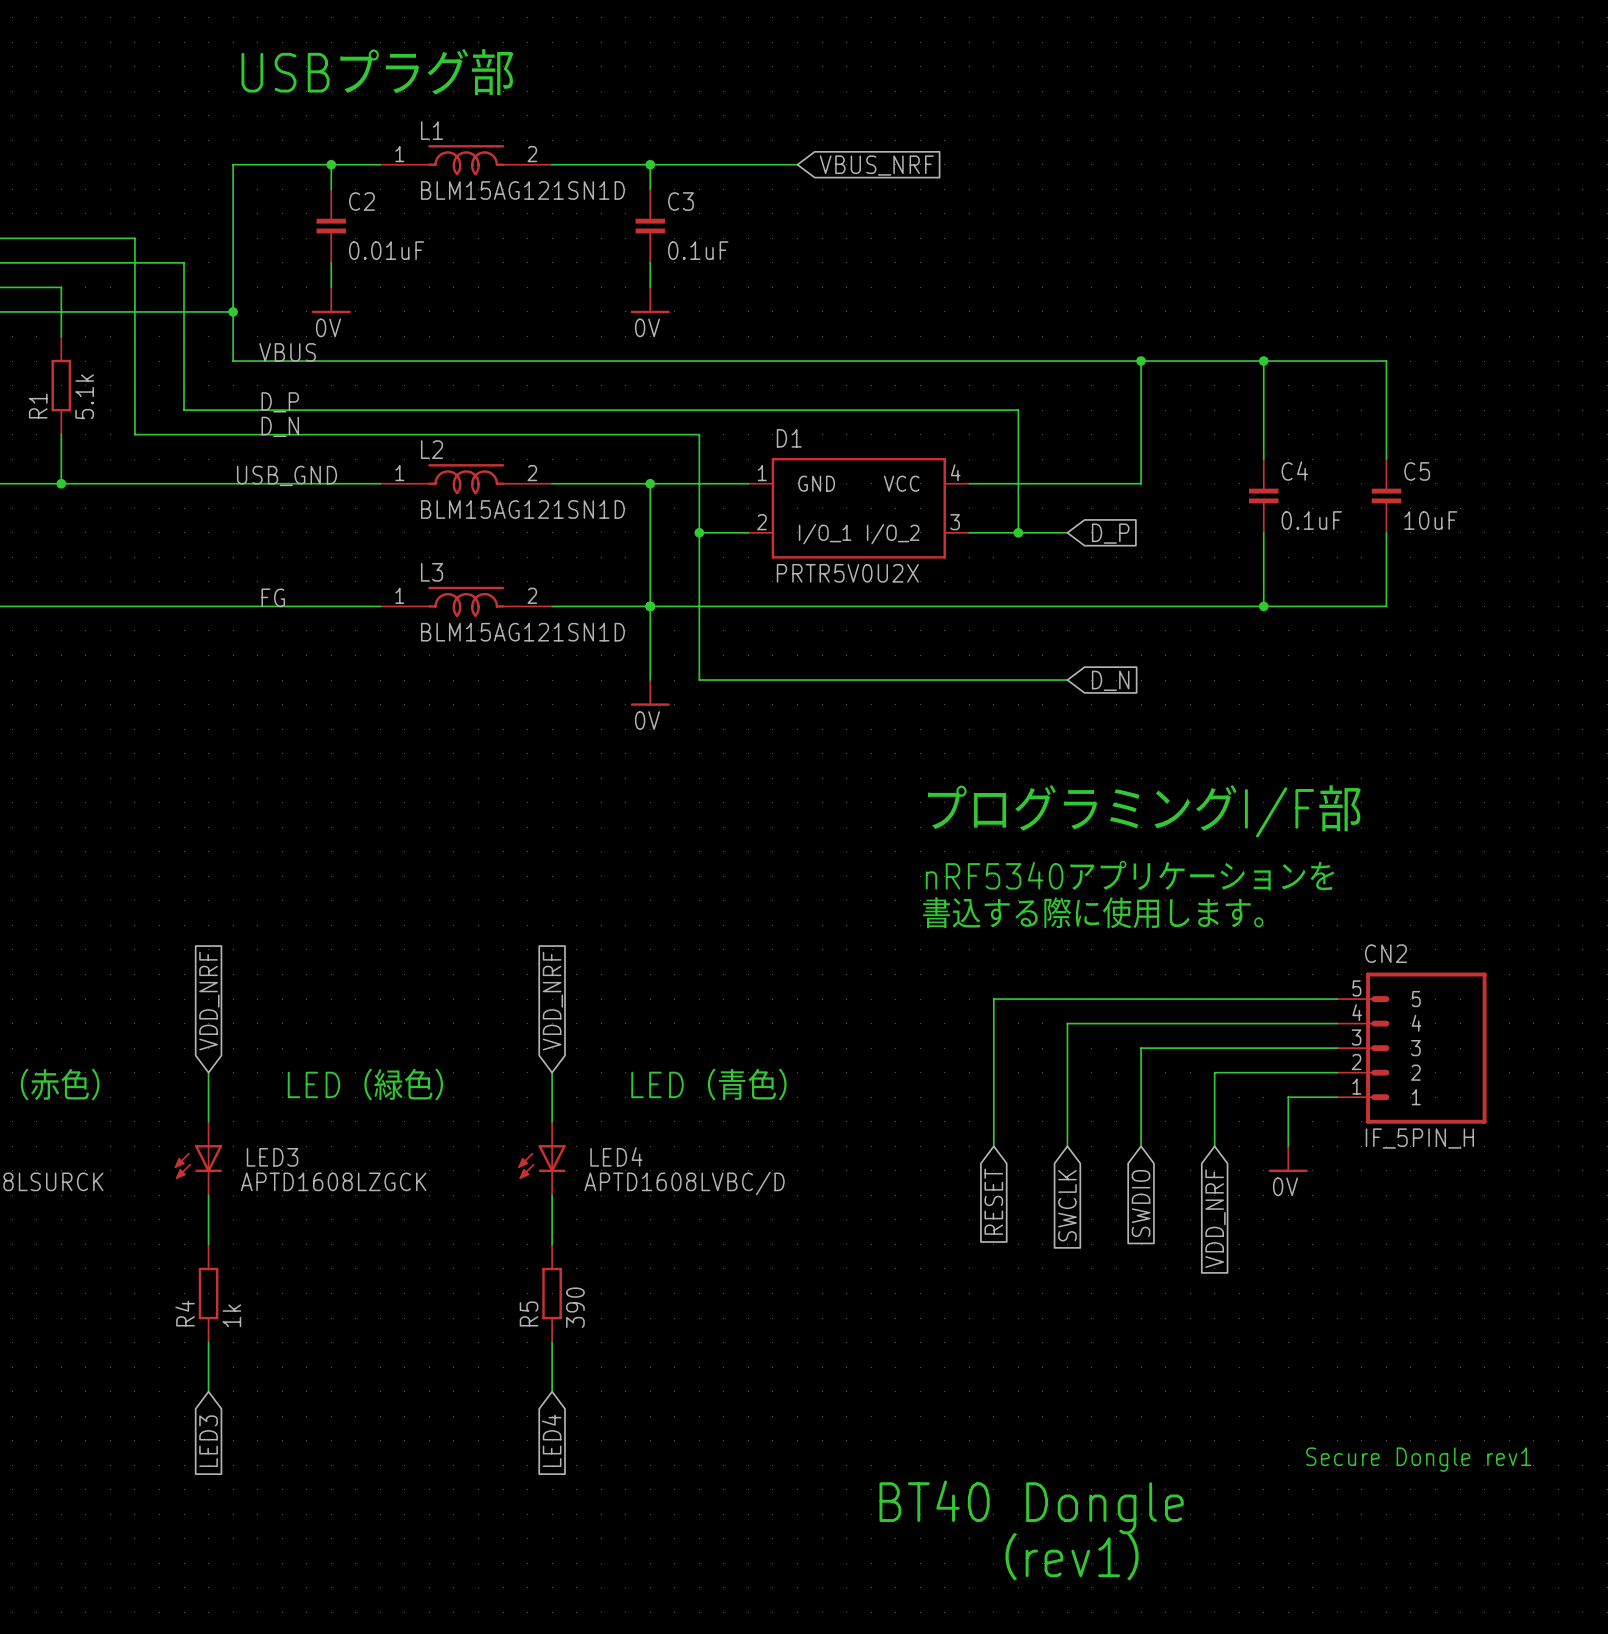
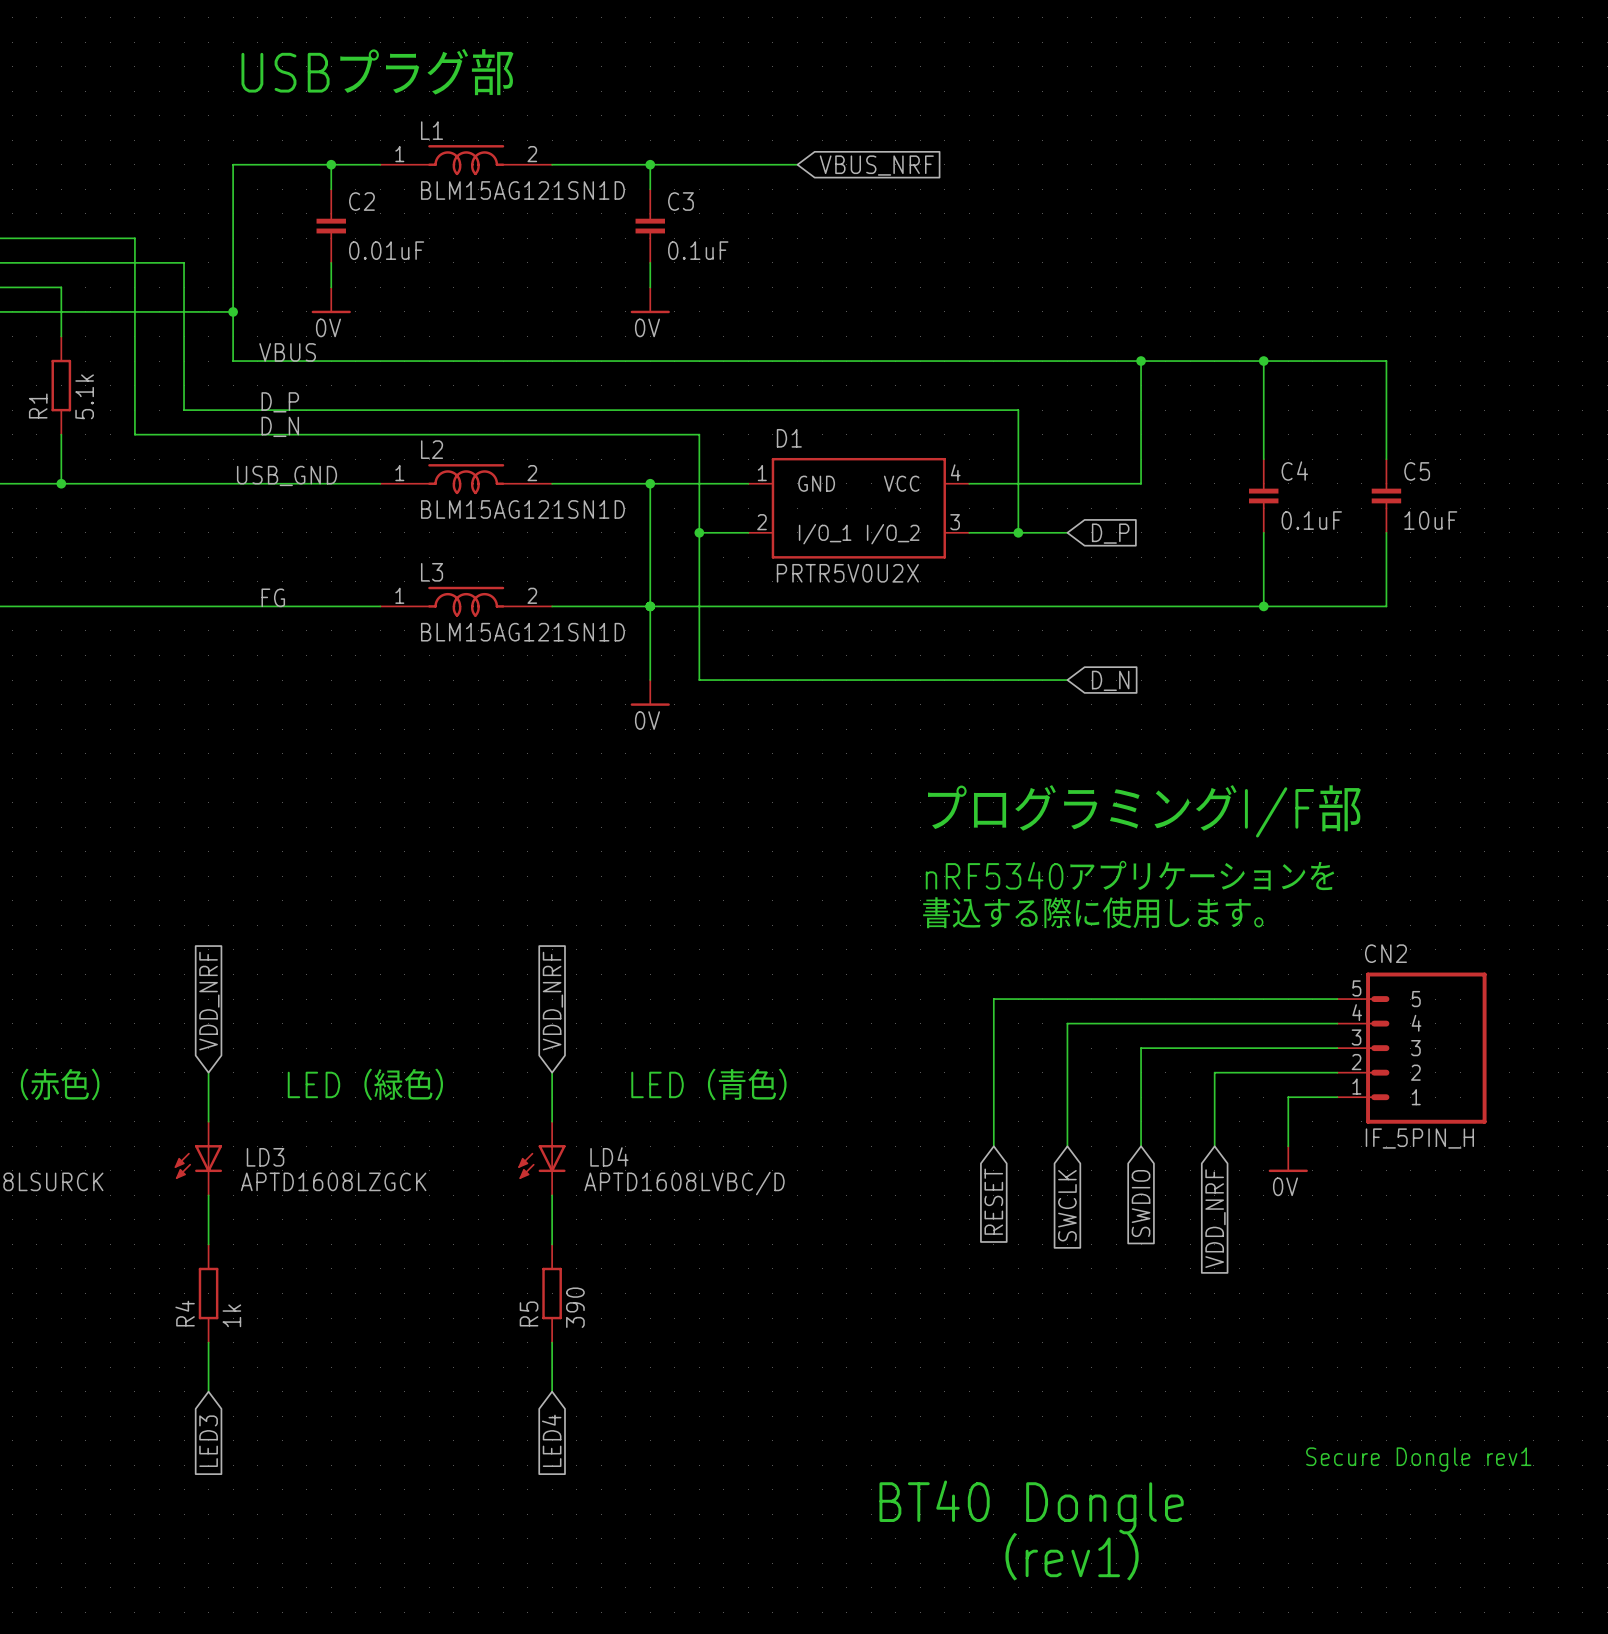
LED4 name: LED4 (616, 1156) -> LD4 (609, 1156)
LED3 name: LED3 (272, 1157) -> LD3 (265, 1157)

